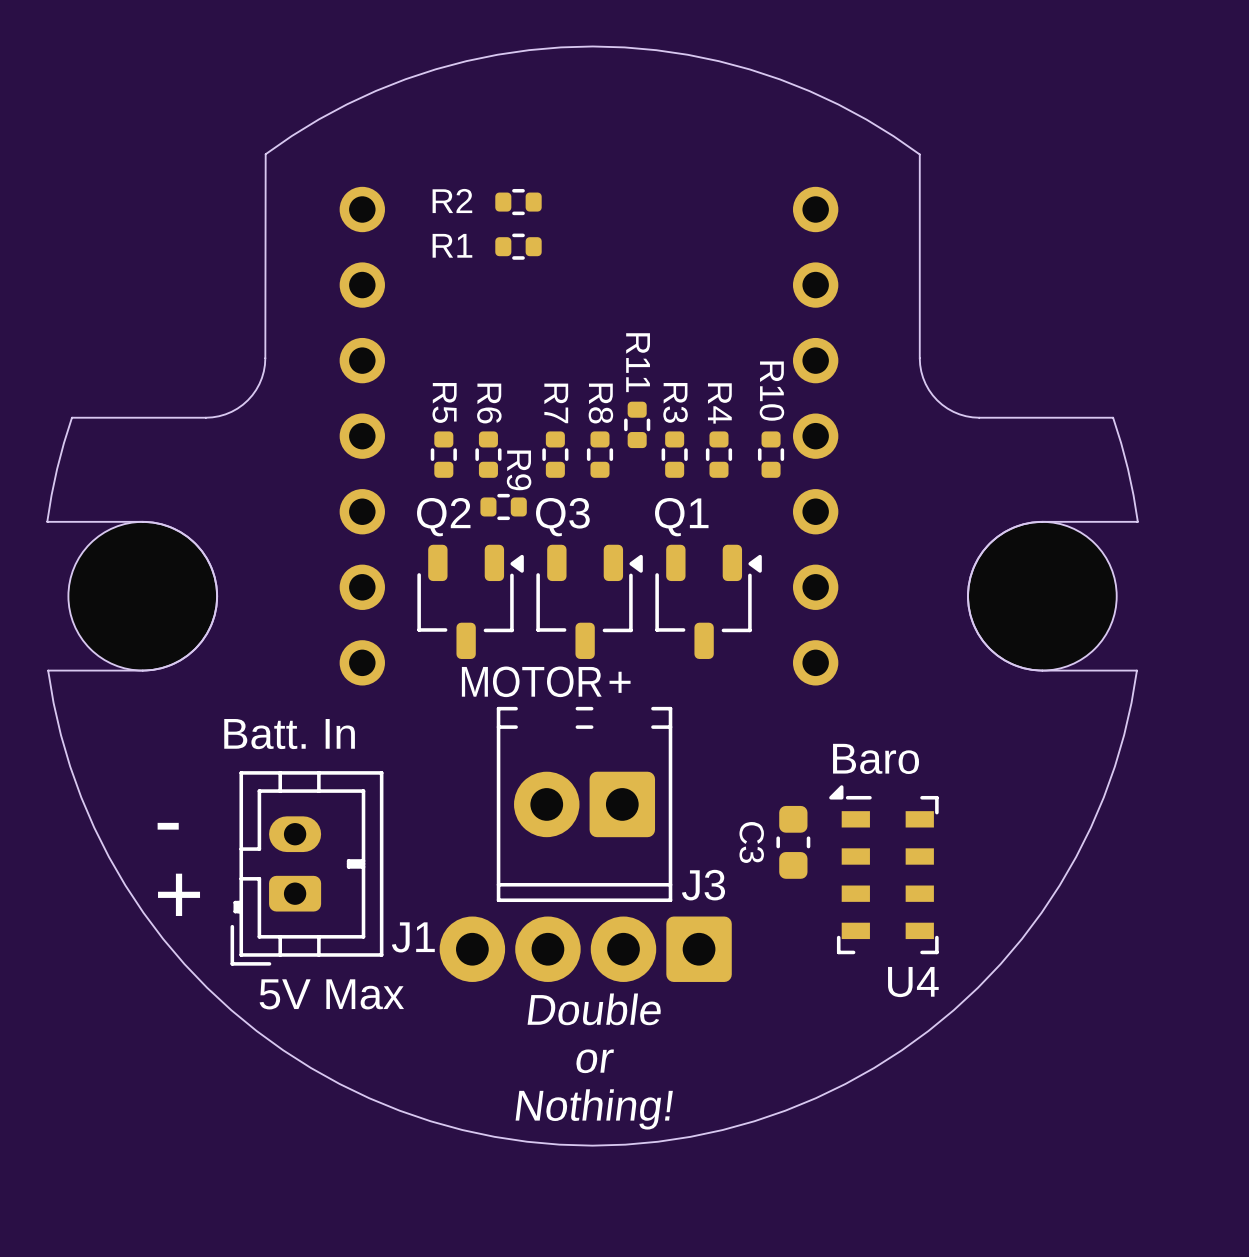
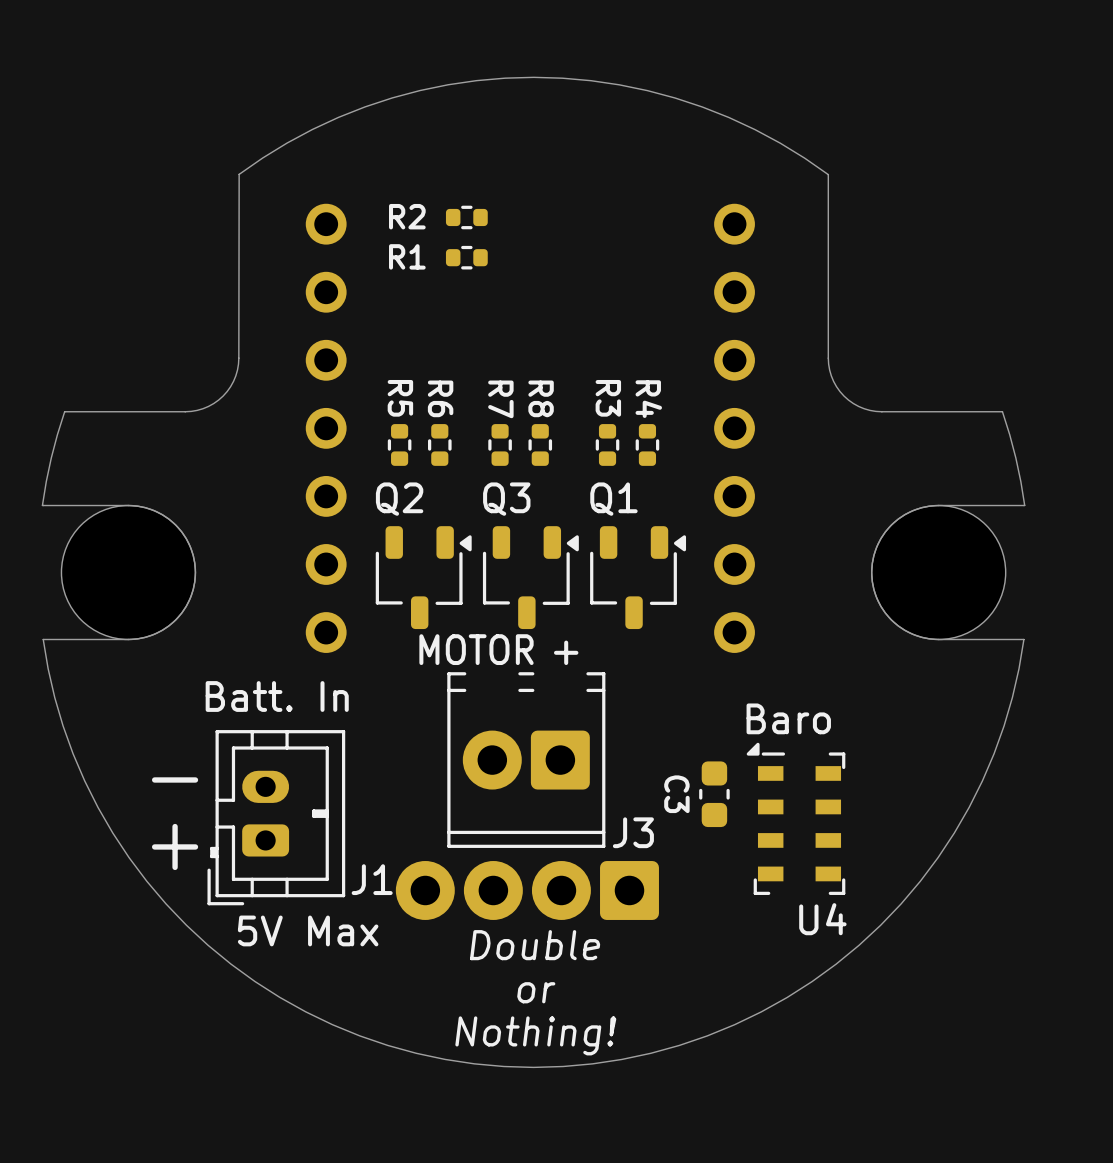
R11: (637, 424) -> none
R10: (771, 454) -> none
R9: (503, 506) -> none

